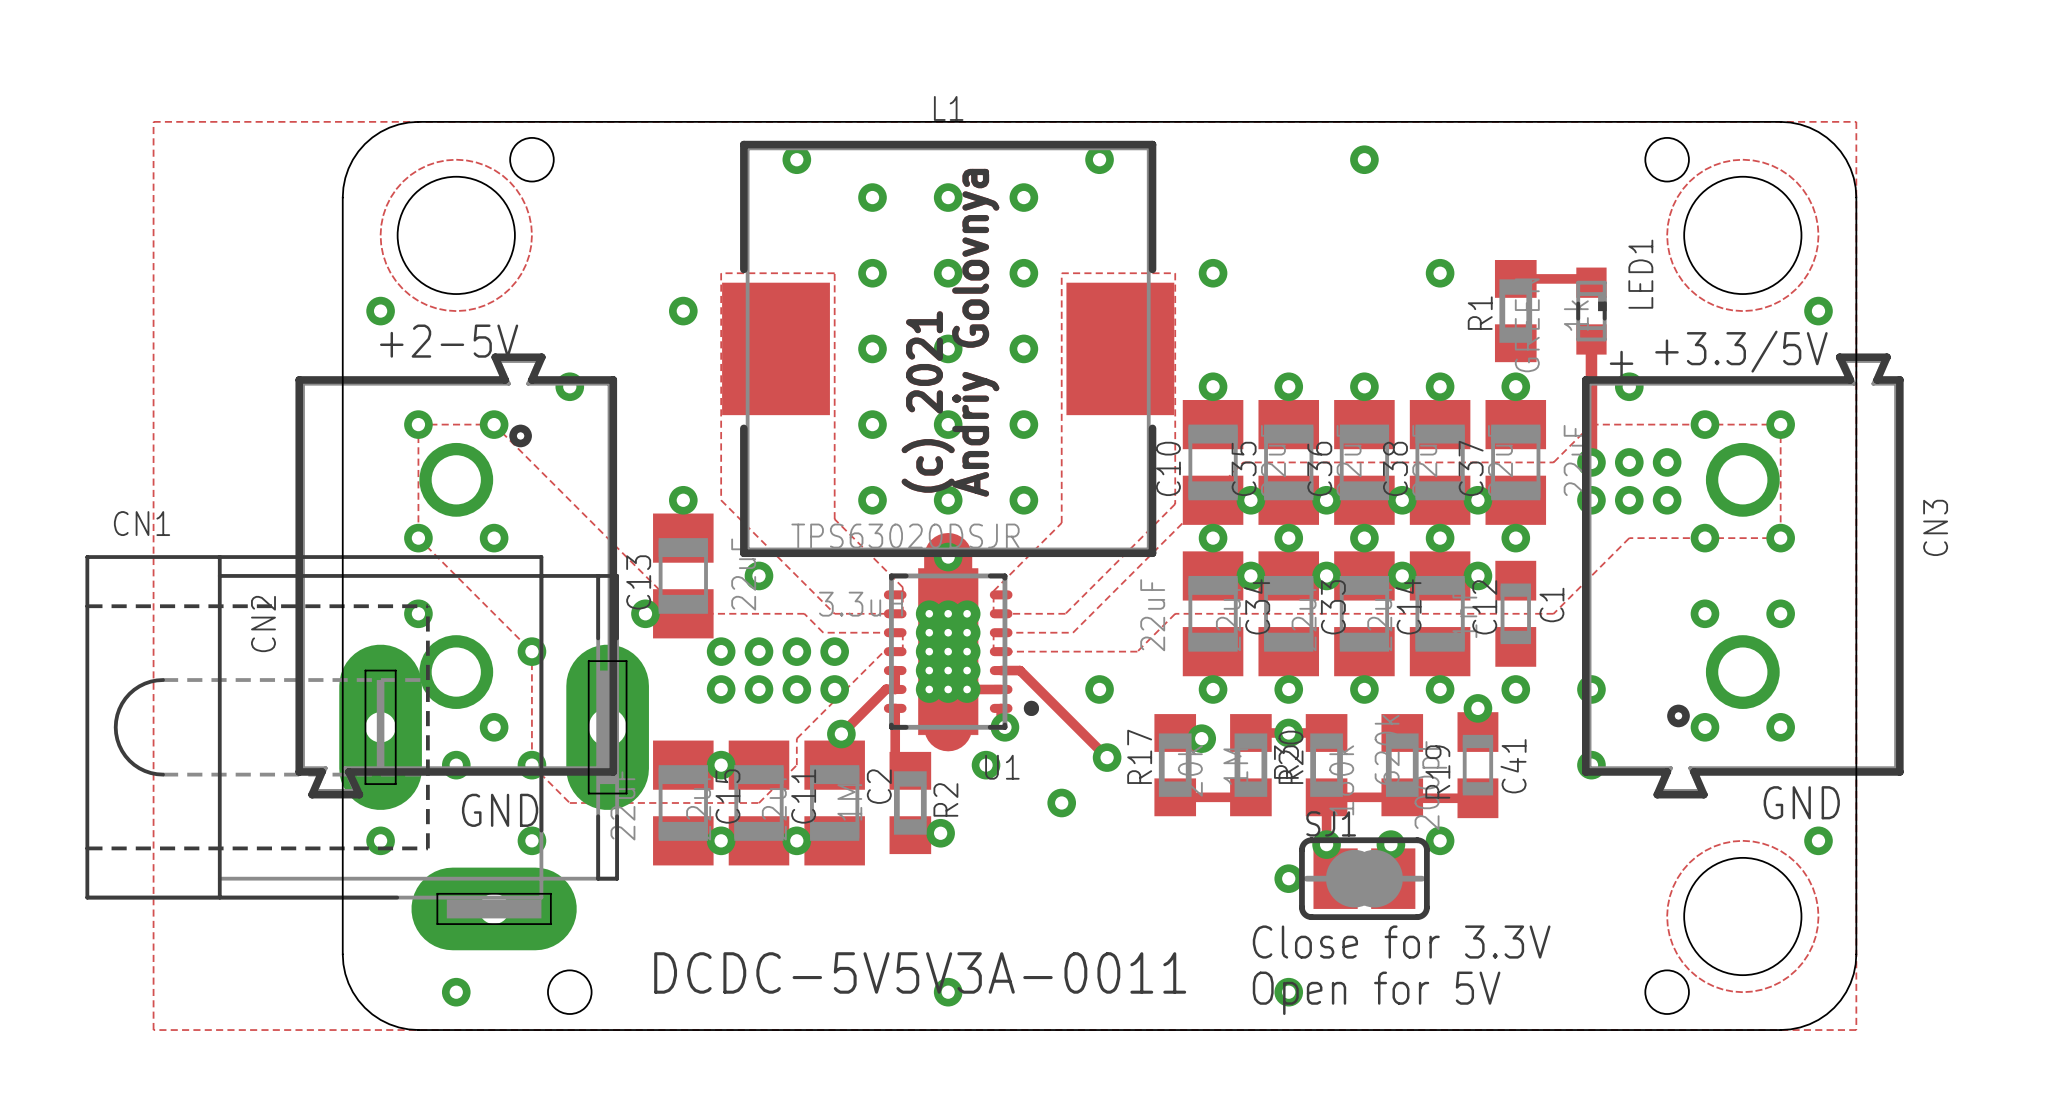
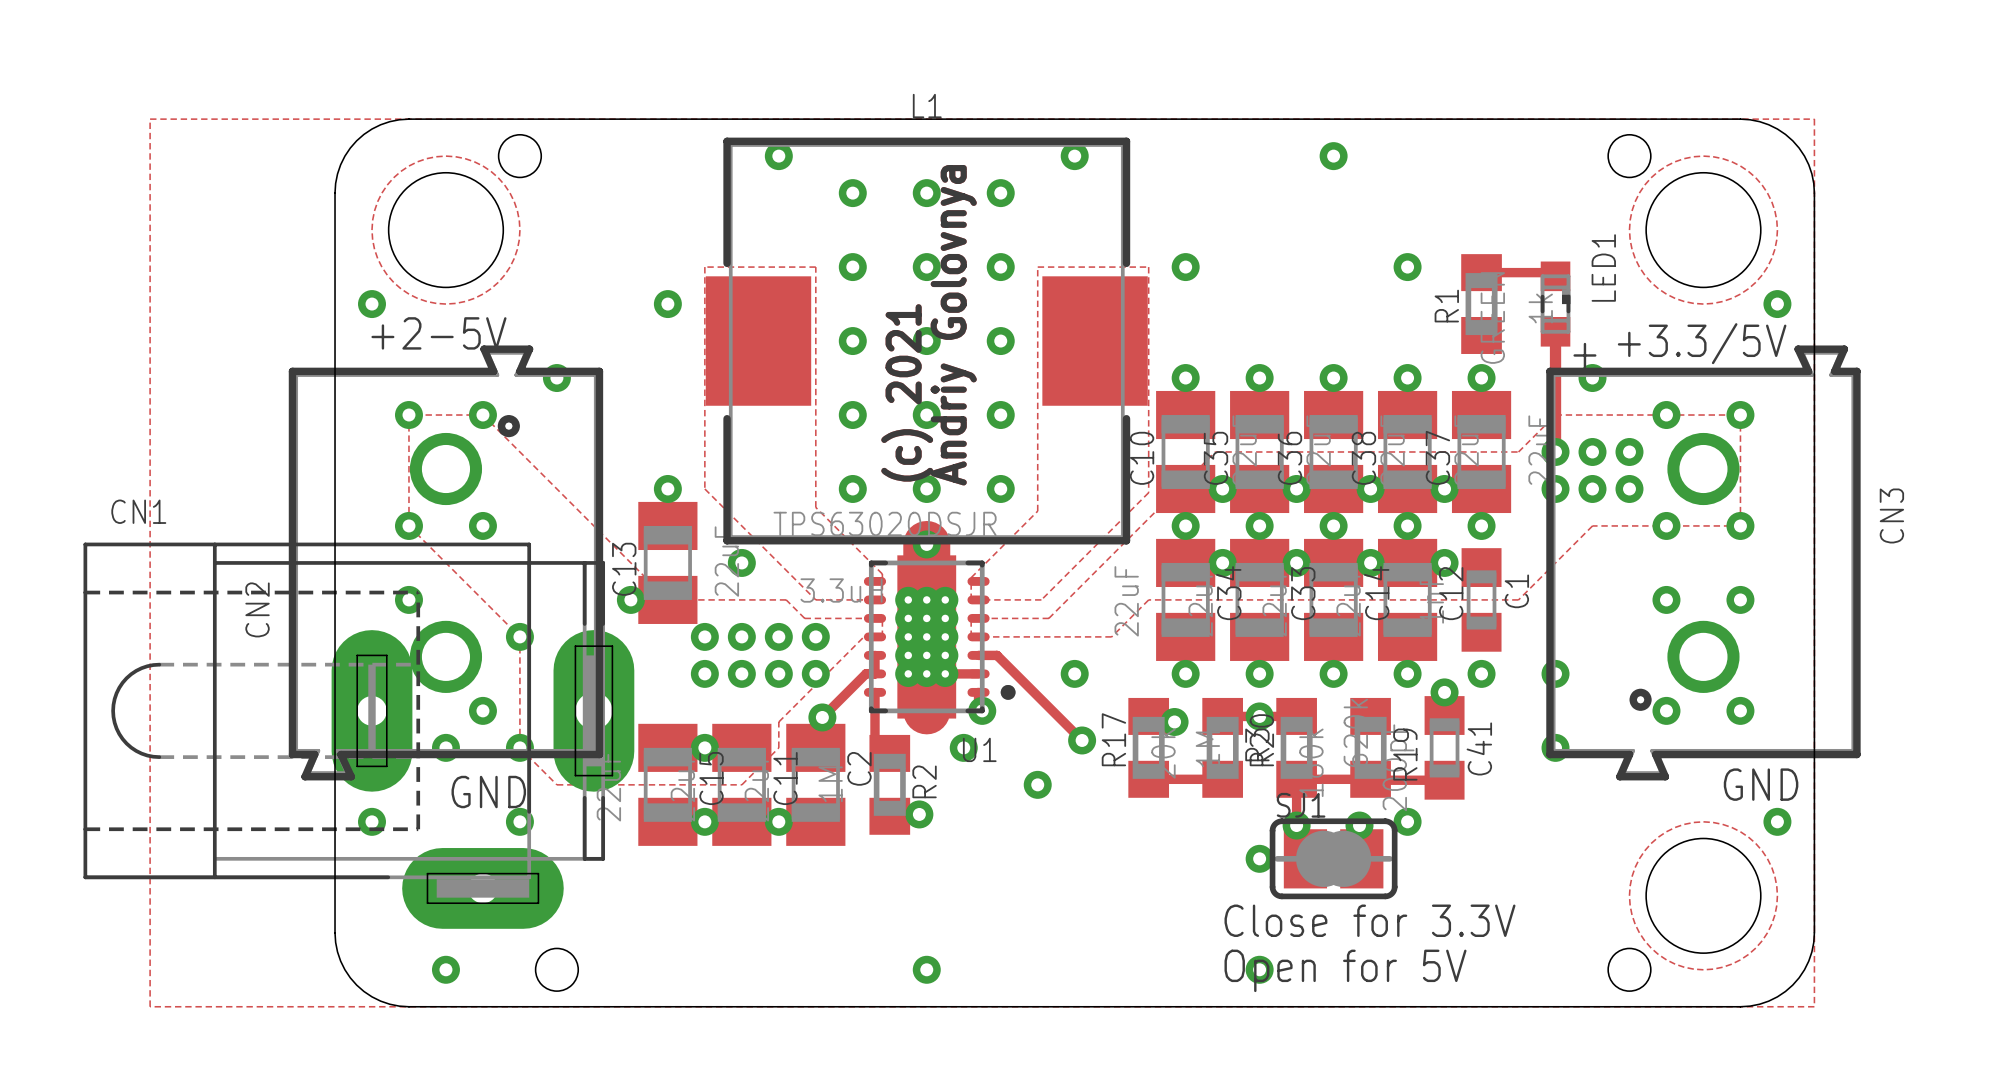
text: DCDC-5V5V3A-0011 (920, 972) -> none

